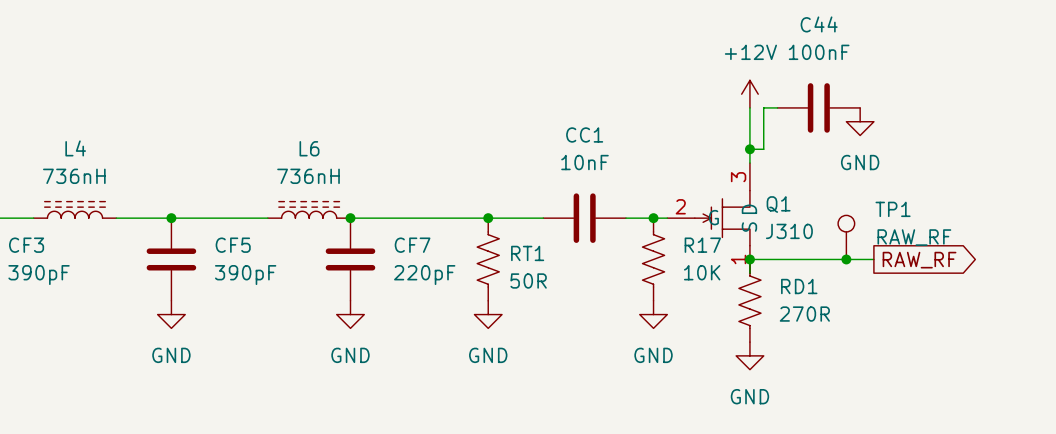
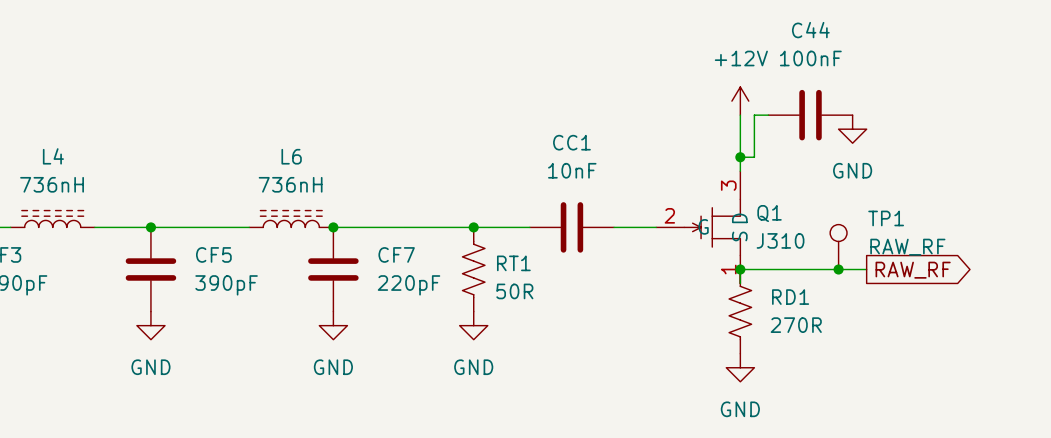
junction: (653, 218) -> none
R17: 10K (653, 259) -> none
power symbol: GND (653, 314) -> none

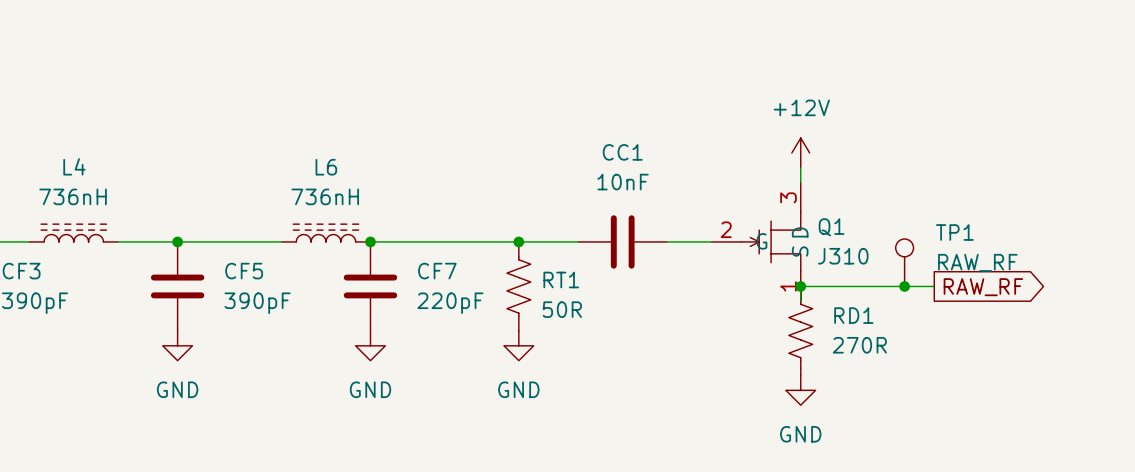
power symbol position: +12V (740, 101) -> +12V (800, 152)
wire: (740, 115) (740, 157) (754, 157) (754, 115) (768, 115) -> none
C44: 100nF (810, 115) -> none
power symbol: GND (852, 129) -> none
junction: (740, 157) -> none

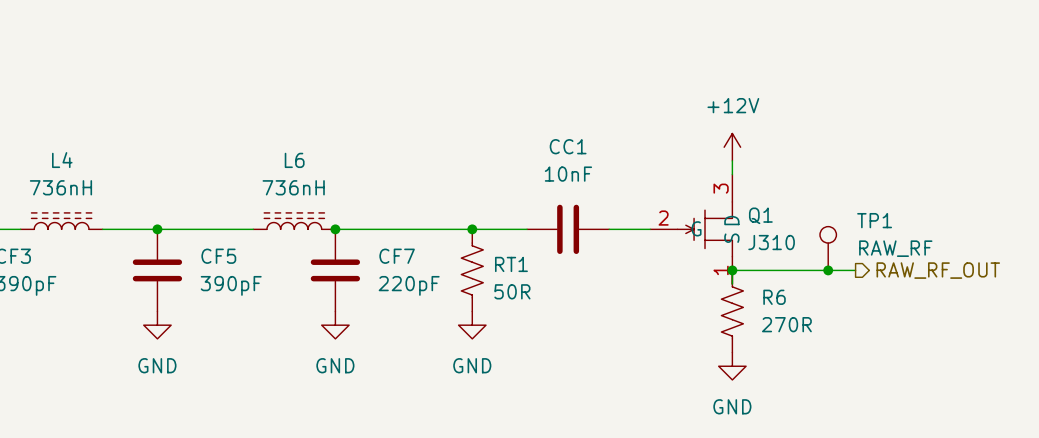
hierarchical label: none -> RAW_RF_OUT (938, 270)
global label: RAW_RF (983, 287) -> none
RD1 name: RD1 (853, 315) -> R6 (774, 297)

